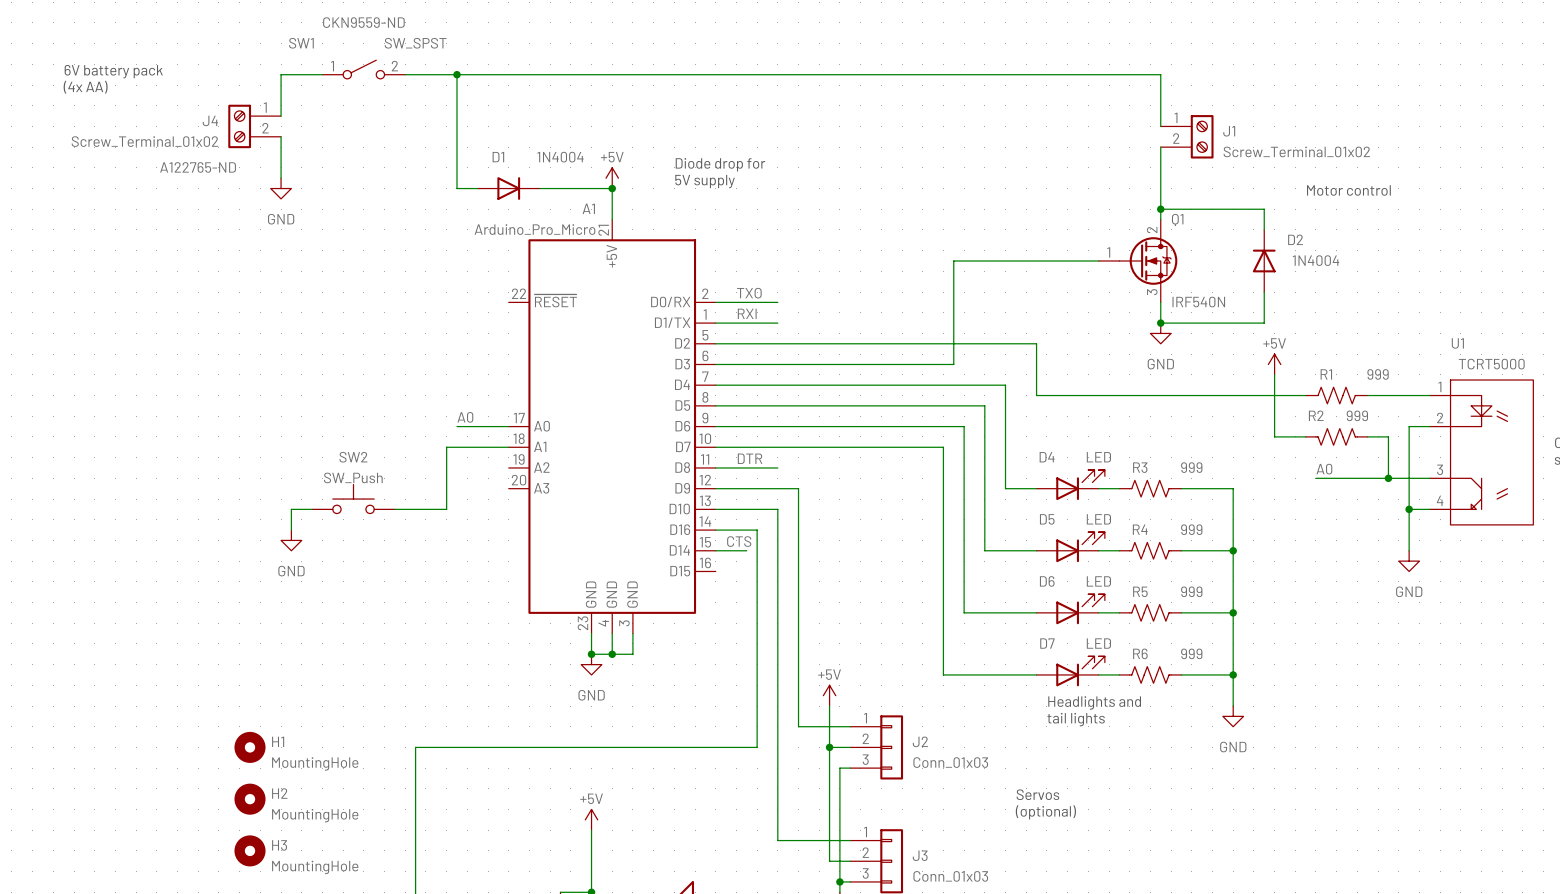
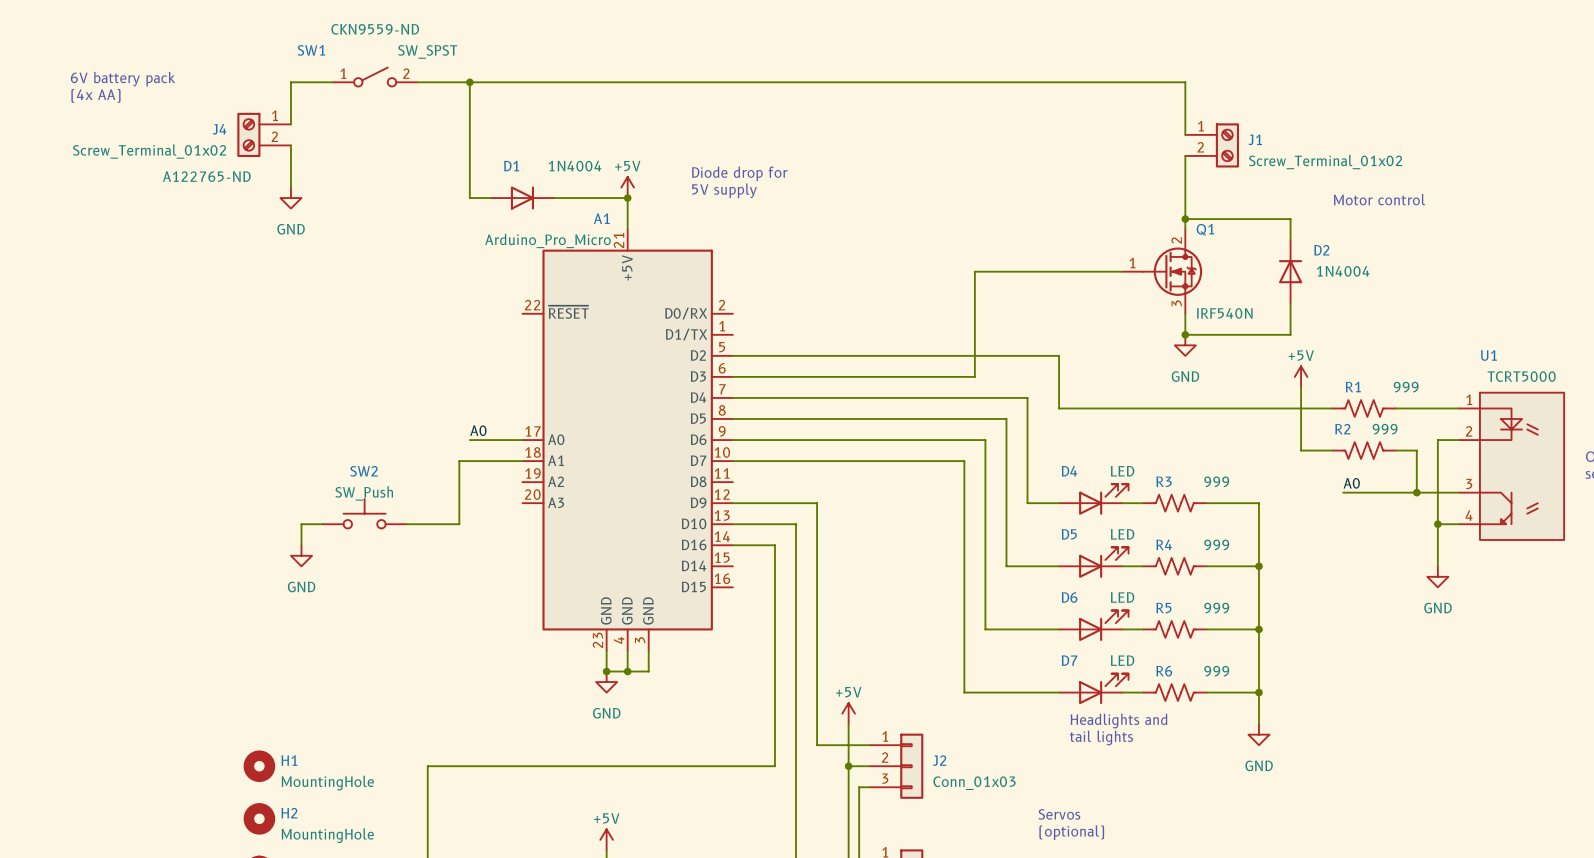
label: TXO (749, 293) -> none
wire: (715, 302) (777, 302) -> none
label: RXI (747, 313) -> none
wire: (715, 323) (777, 323) -> none
label: DTR (750, 458) -> none
wire: (715, 467) (777, 467) -> none
label: CTS (739, 541) -> none
wire: (715, 550) (746, 550) -> none

